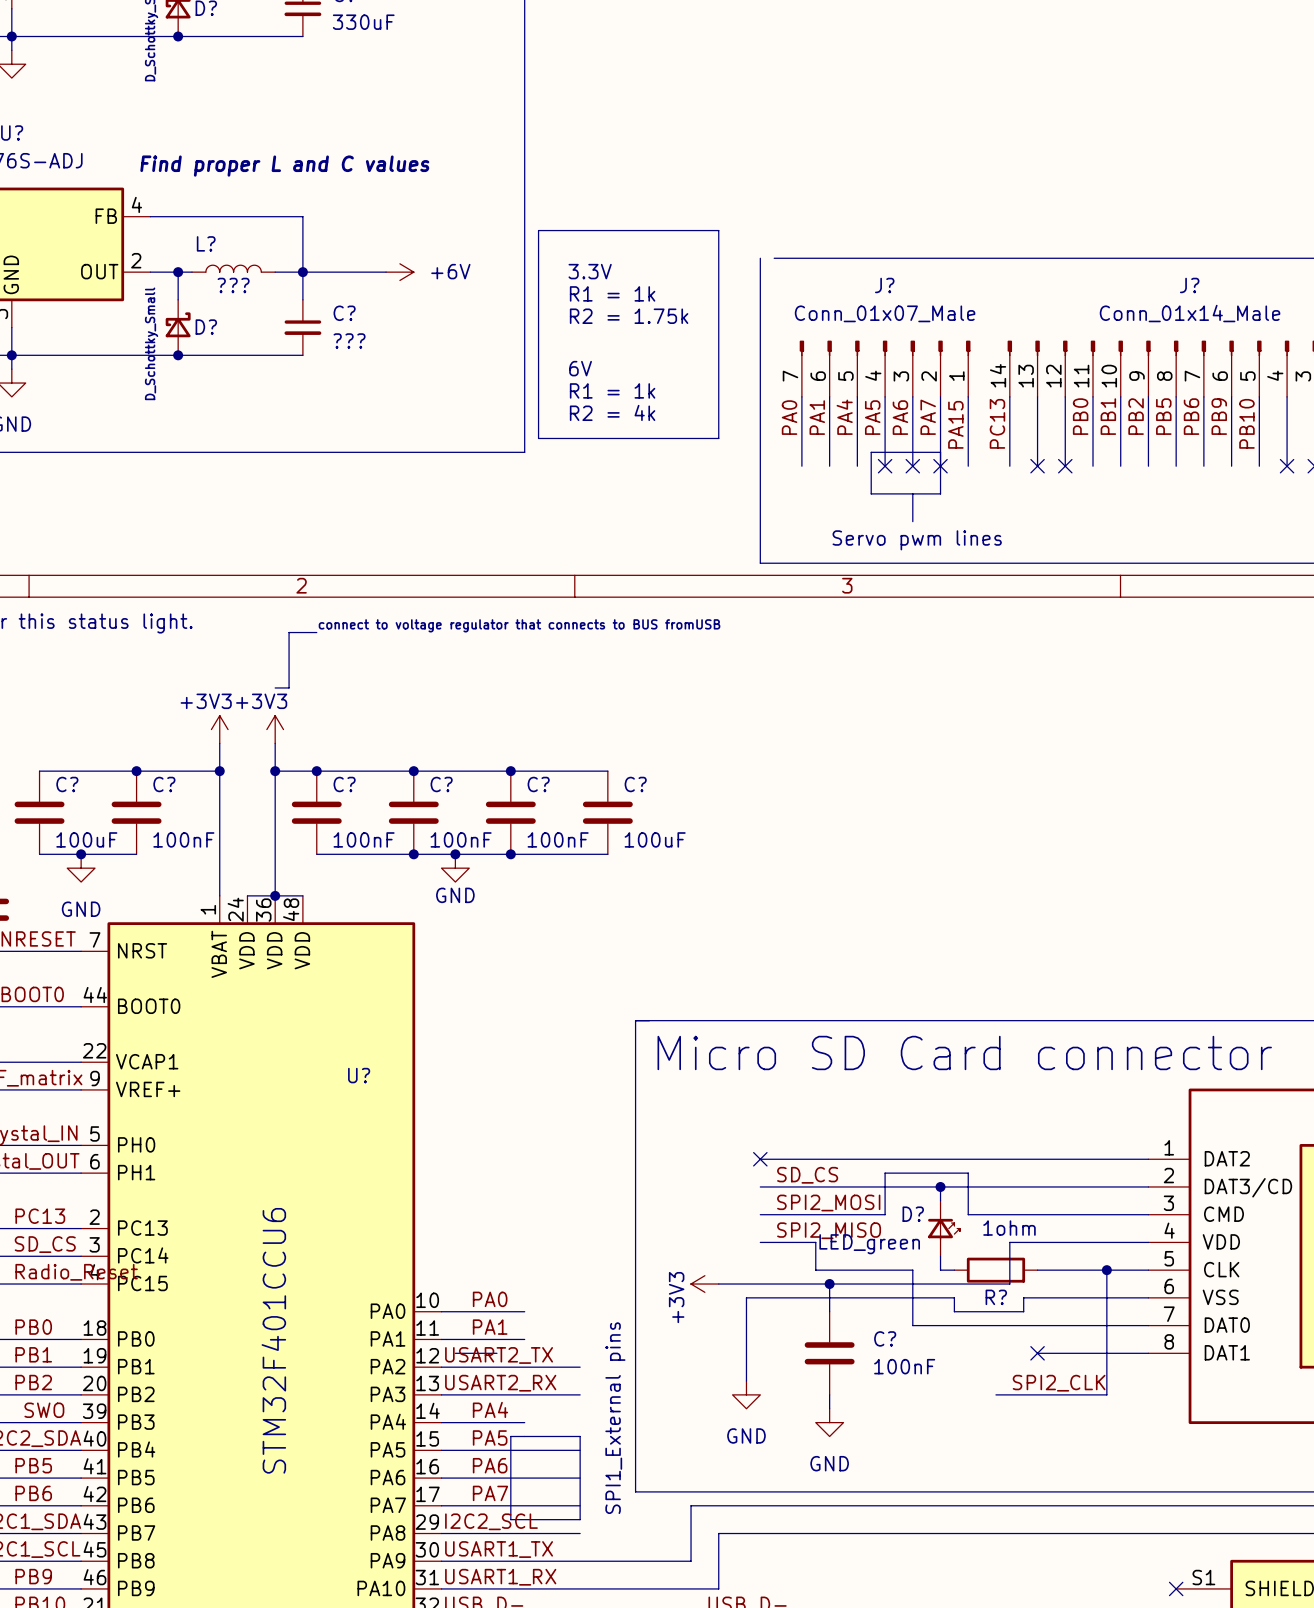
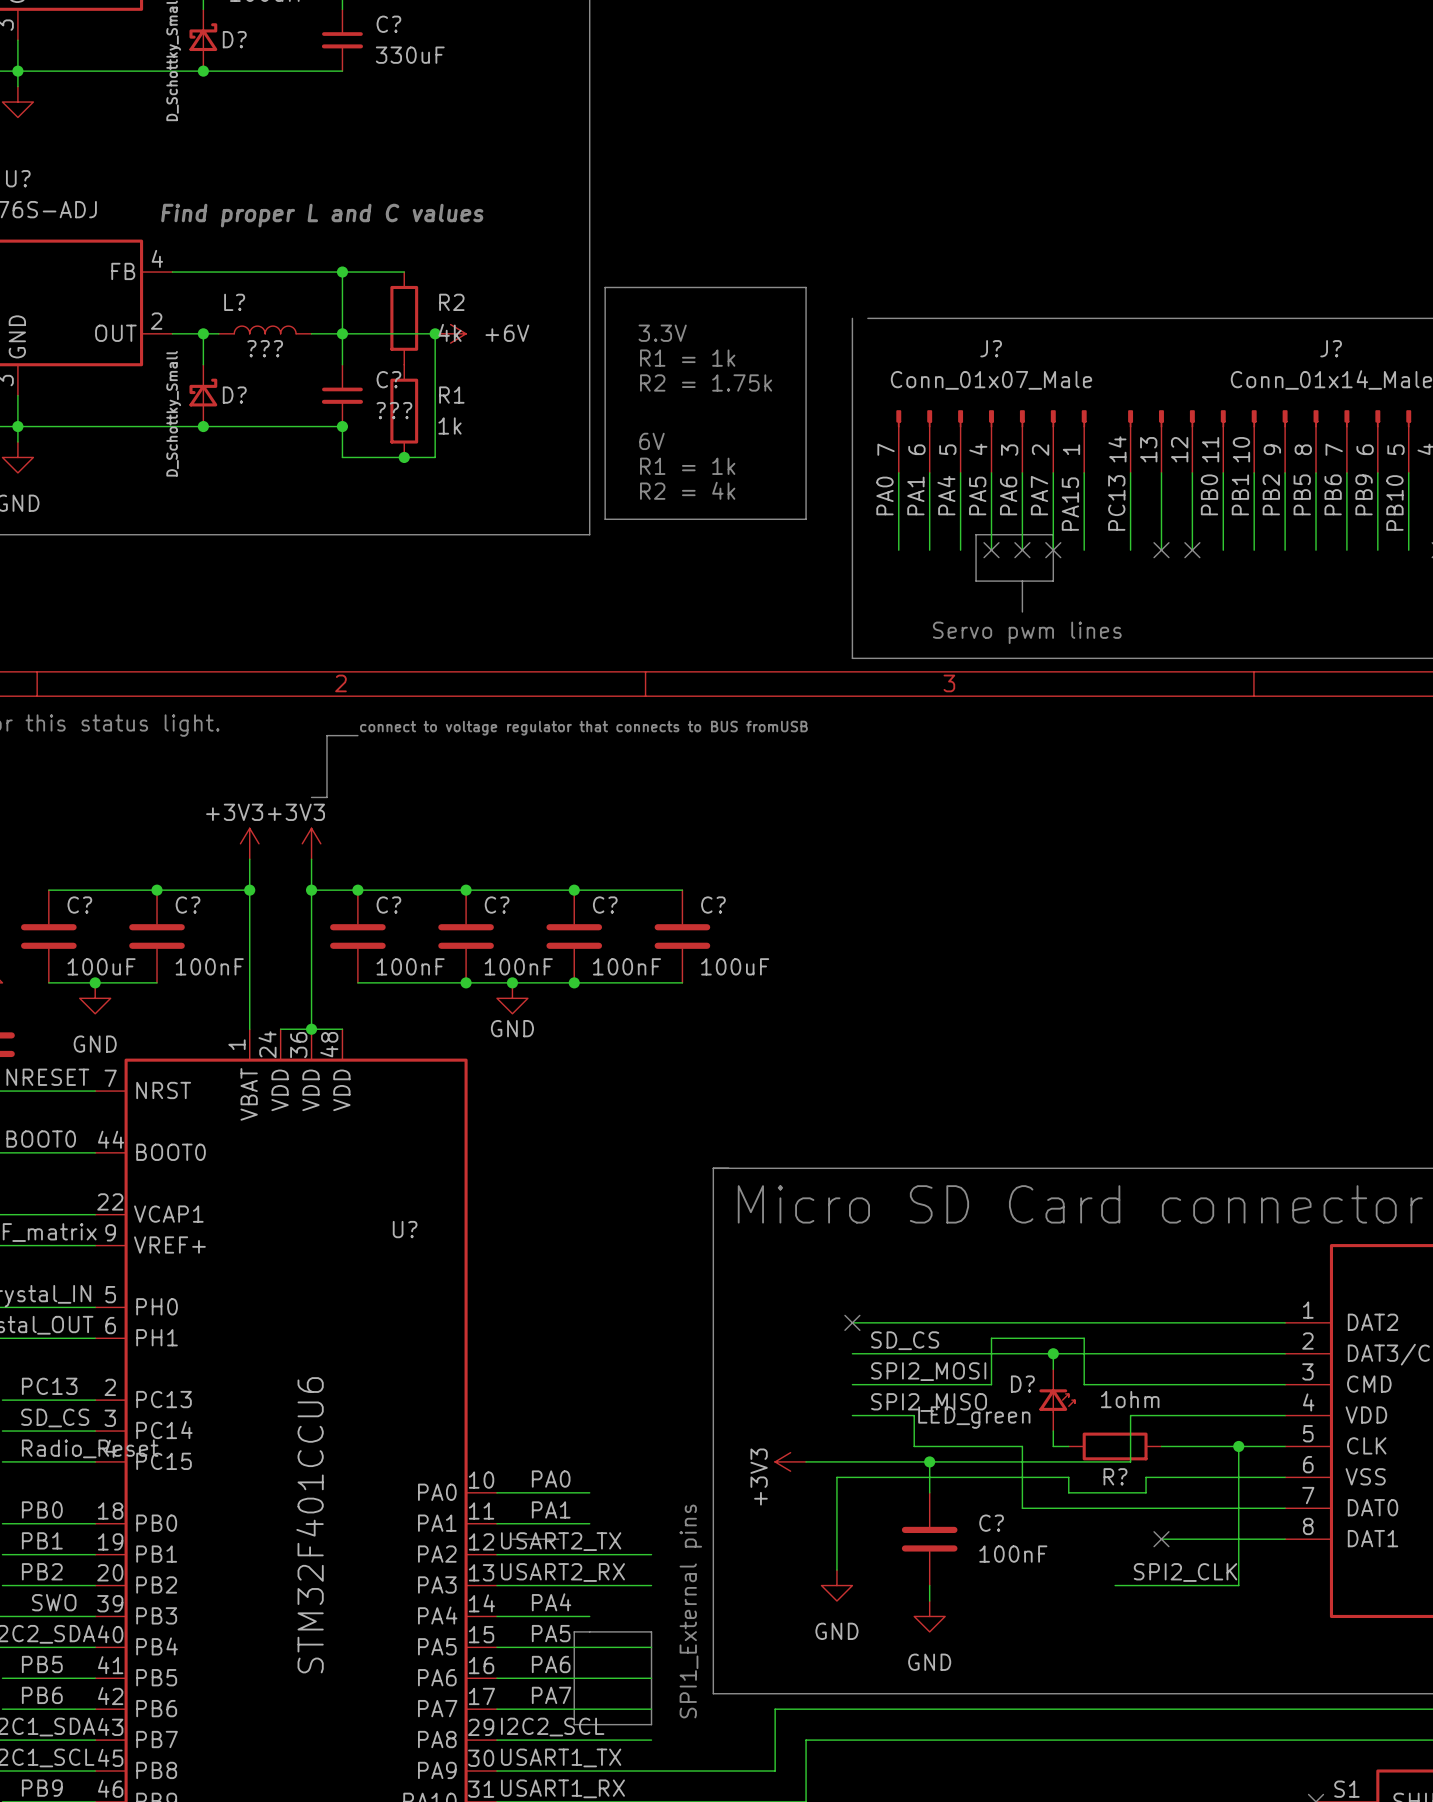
wire: none -> (342, 272) (404, 272)
junction: none -> (342, 272)
R2: none -> 4k (404, 318)
wire: none -> (435, 333) (435, 457) (342, 457) (342, 426)
junction: none -> (435, 333)
R1: none -> 1k (404, 411)
junction: none -> (342, 426)
junction: none -> (404, 457)

